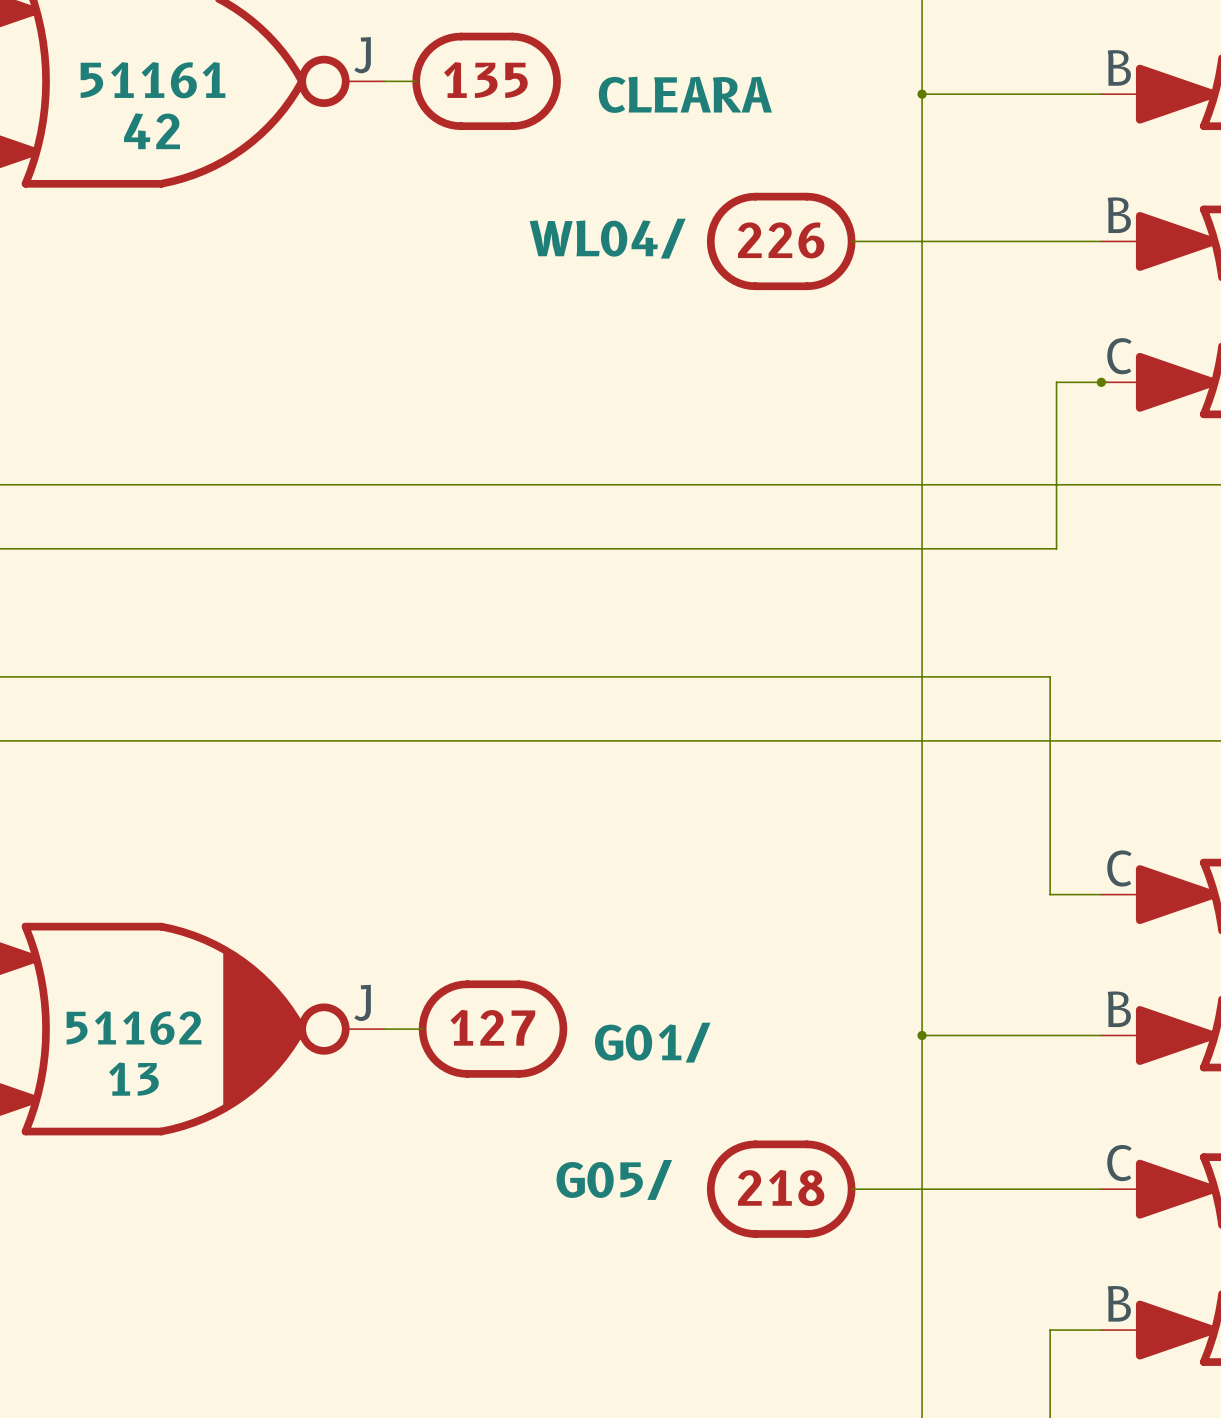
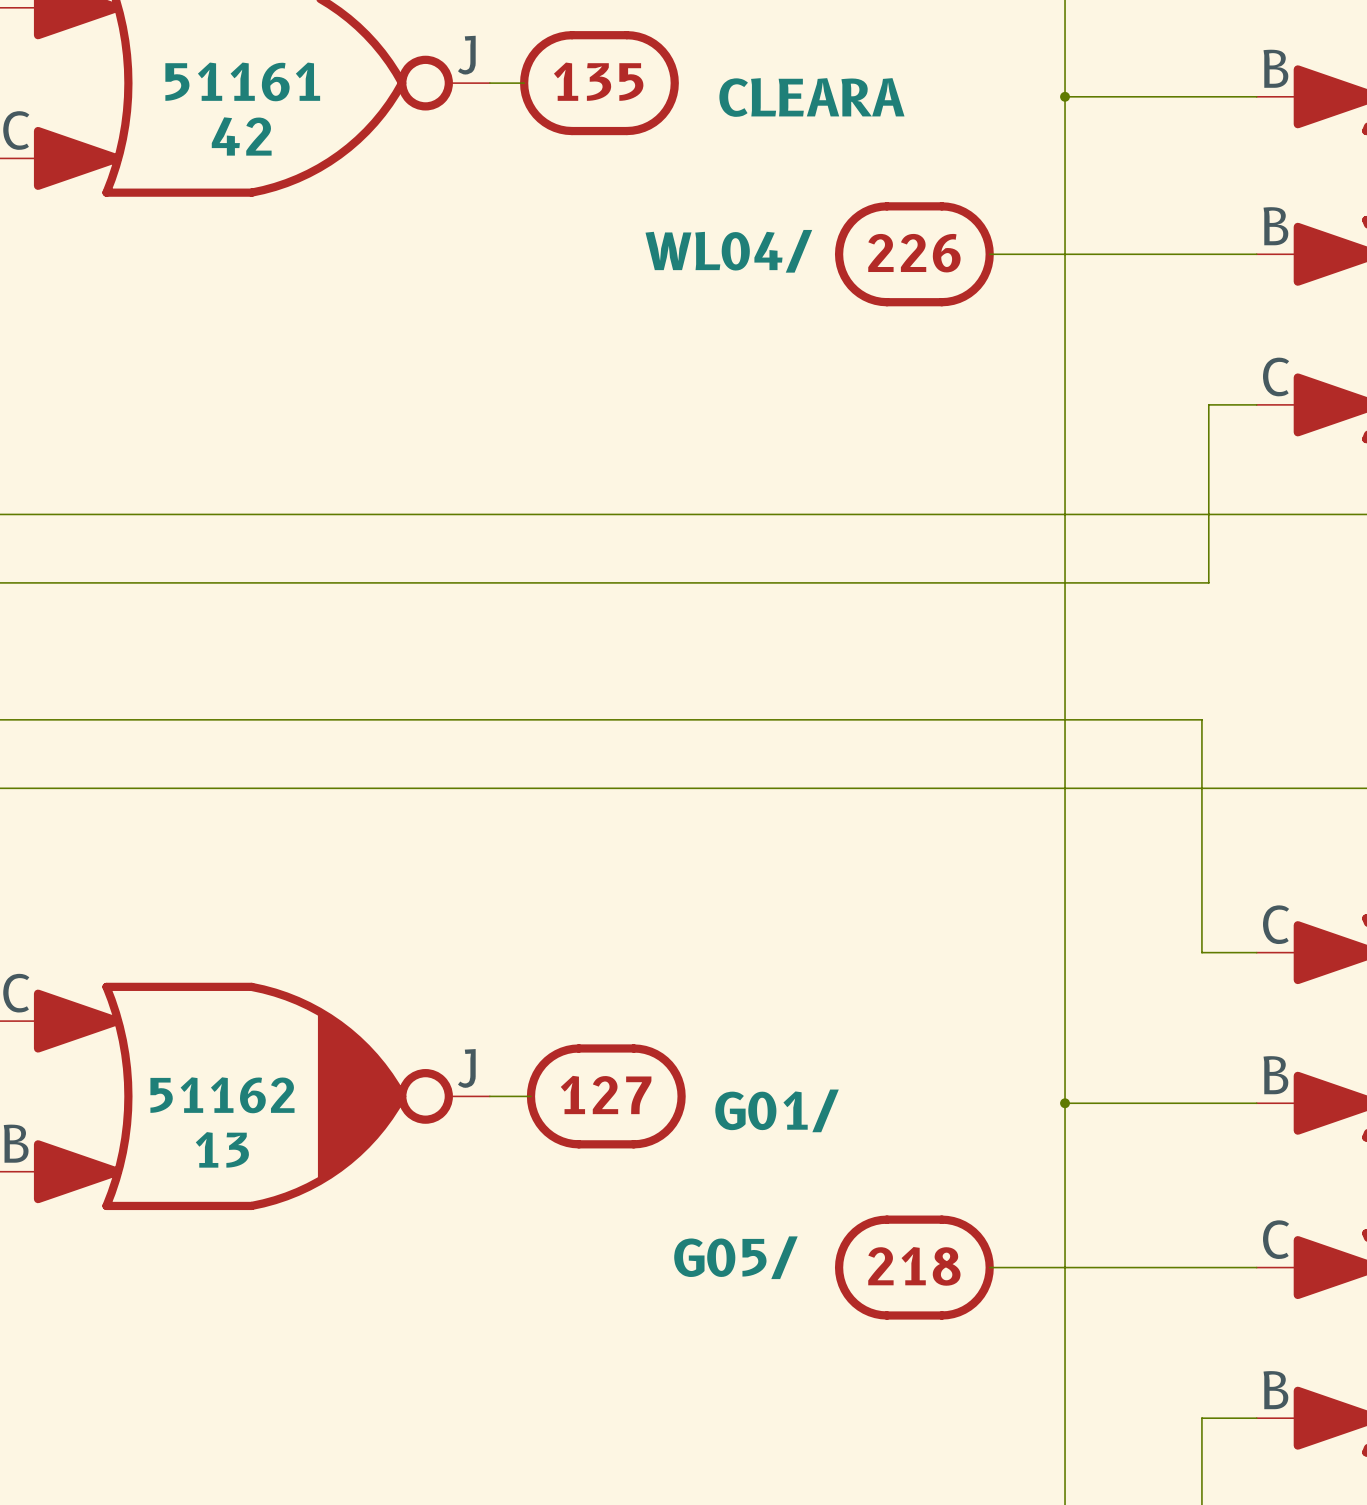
junction: (1101, 382) -> none

